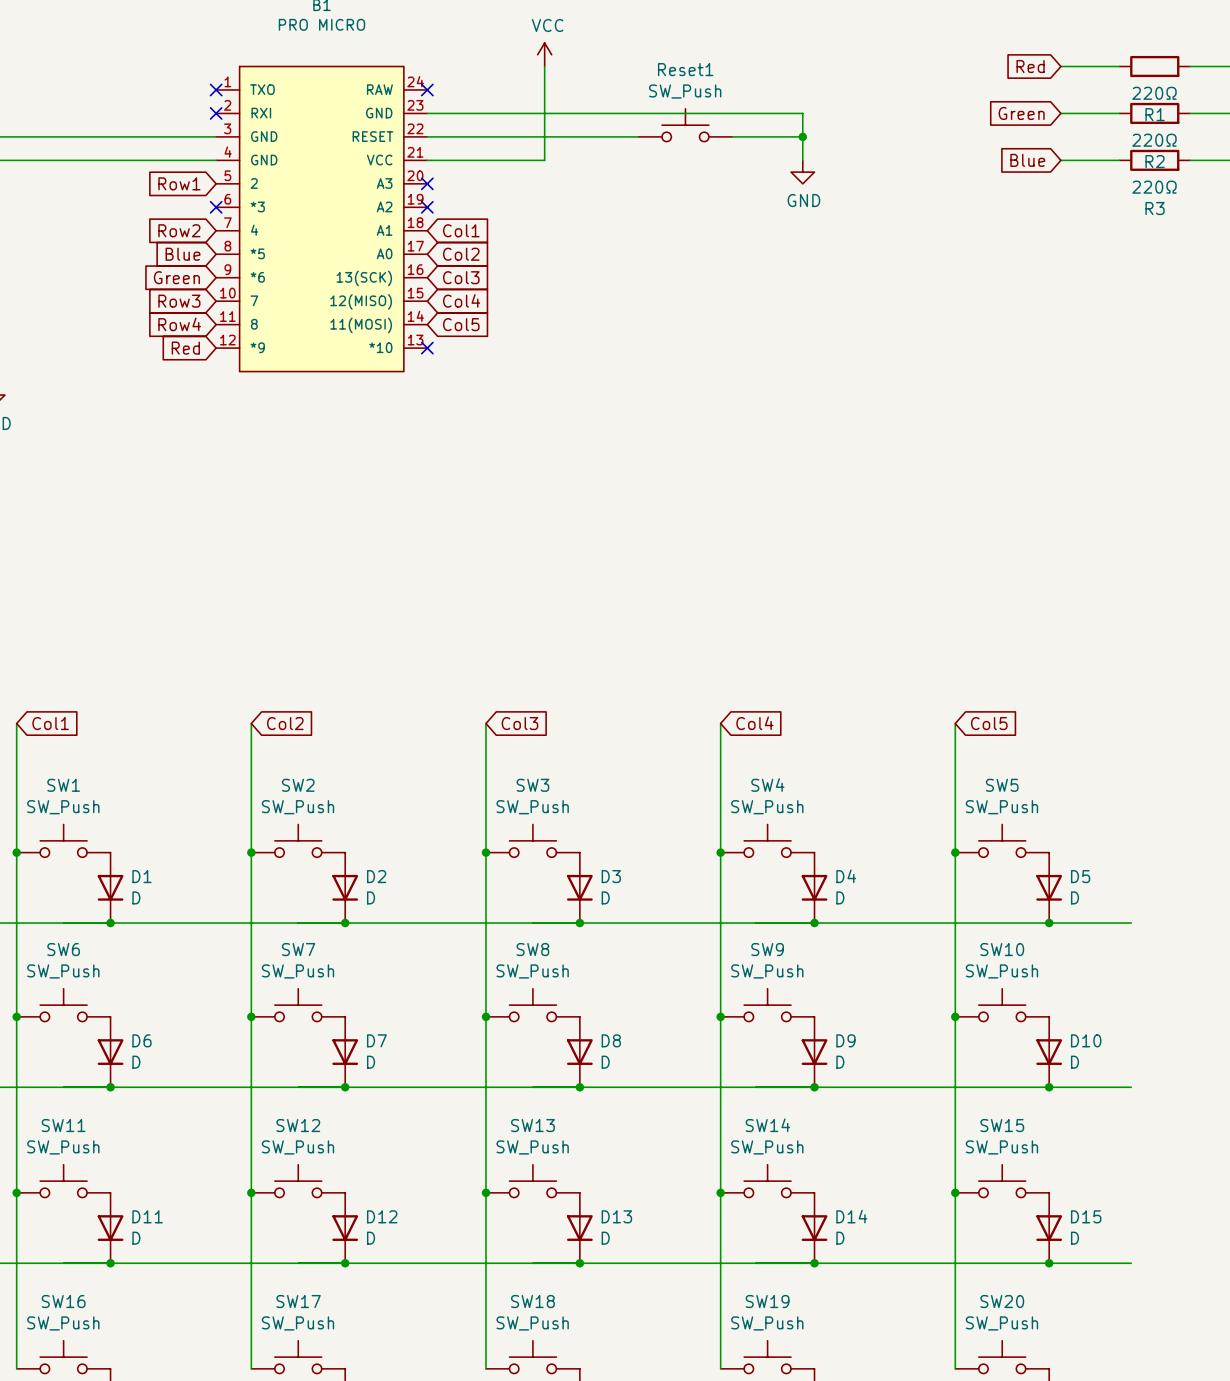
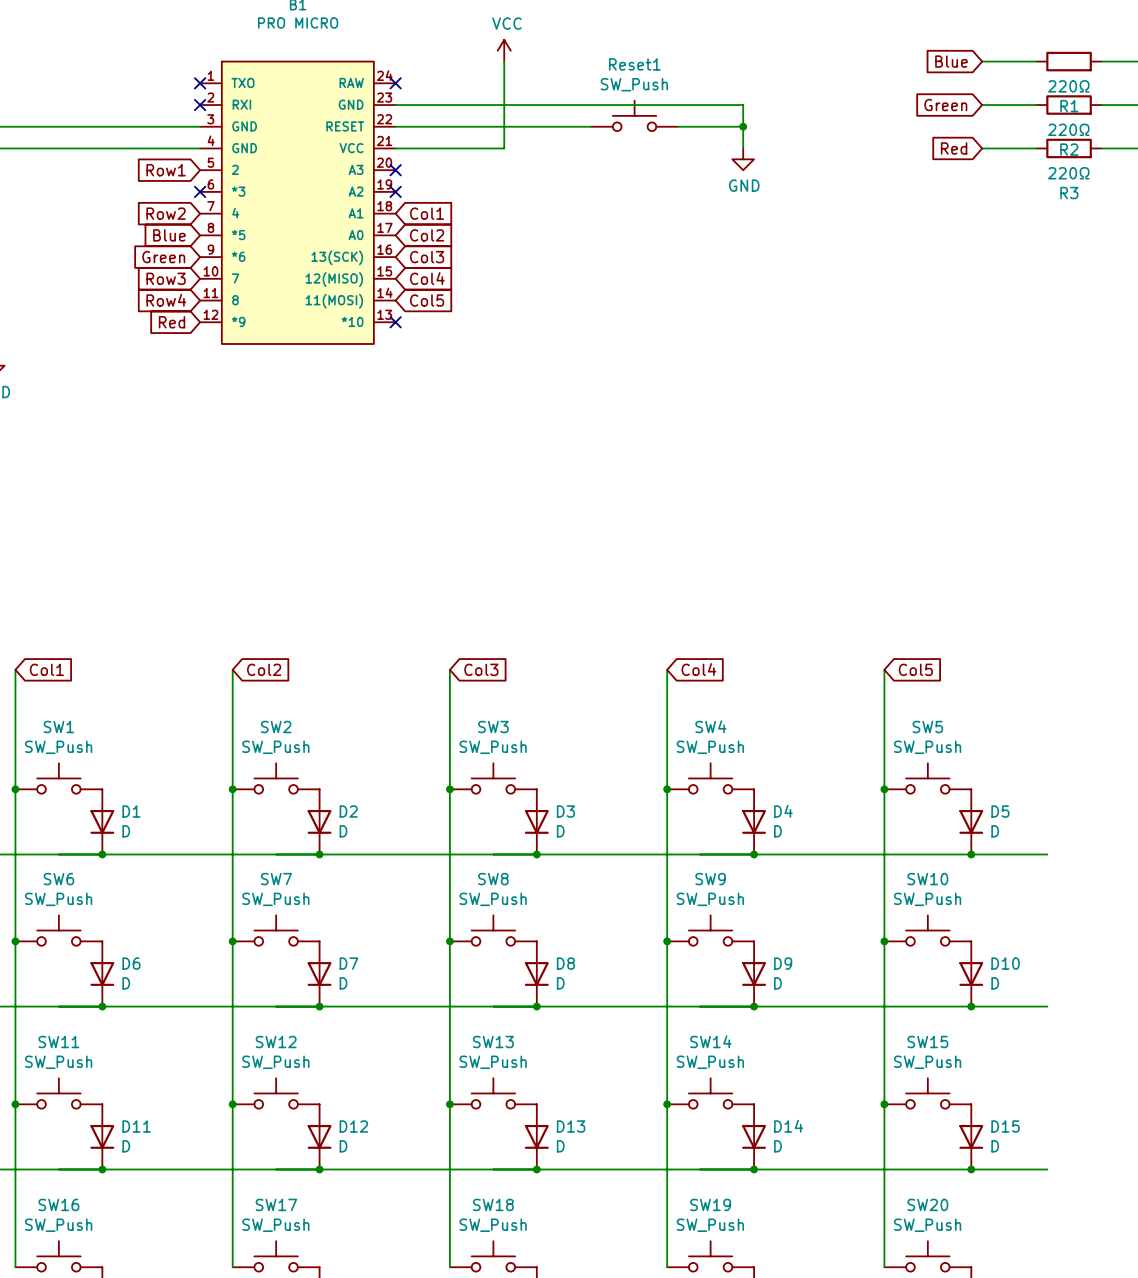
global label: Red (1030, 66) -> Blue (951, 61)
global label: Blue (1027, 160) -> Red (954, 148)

